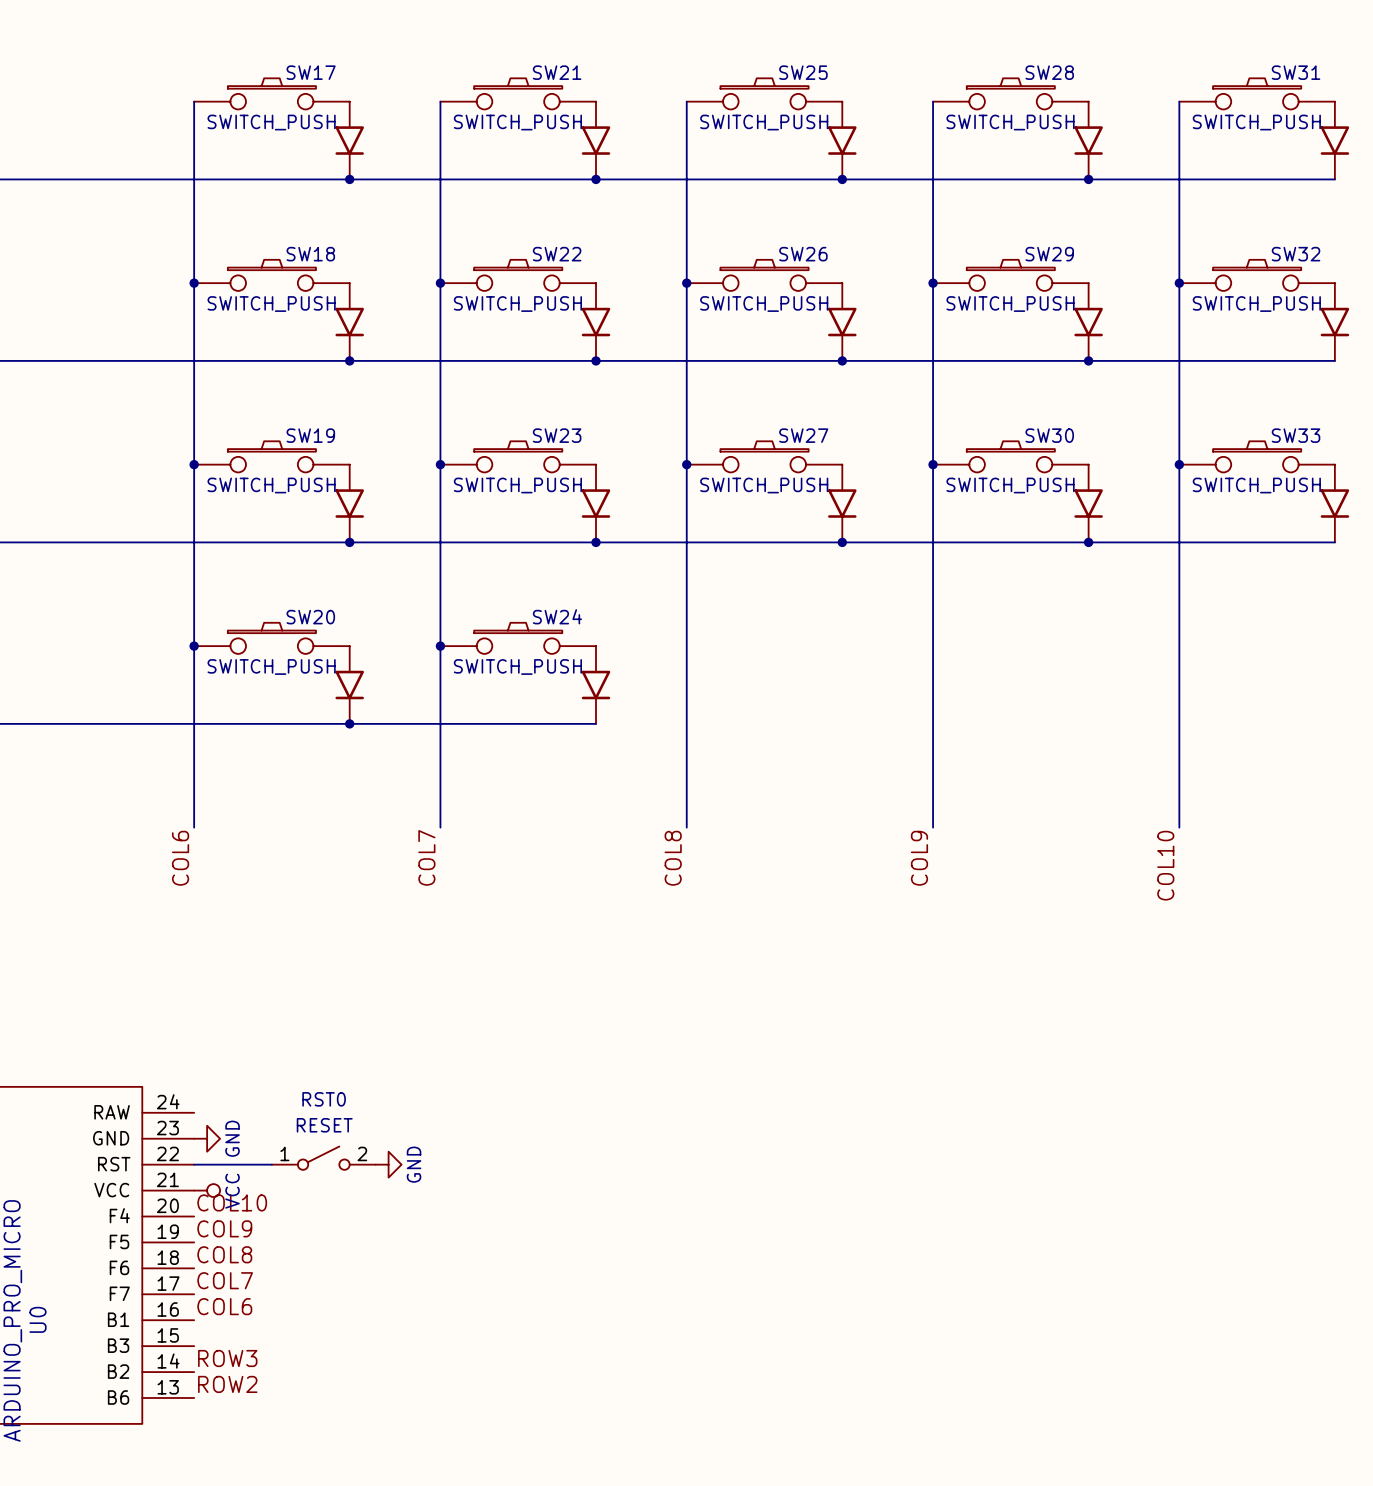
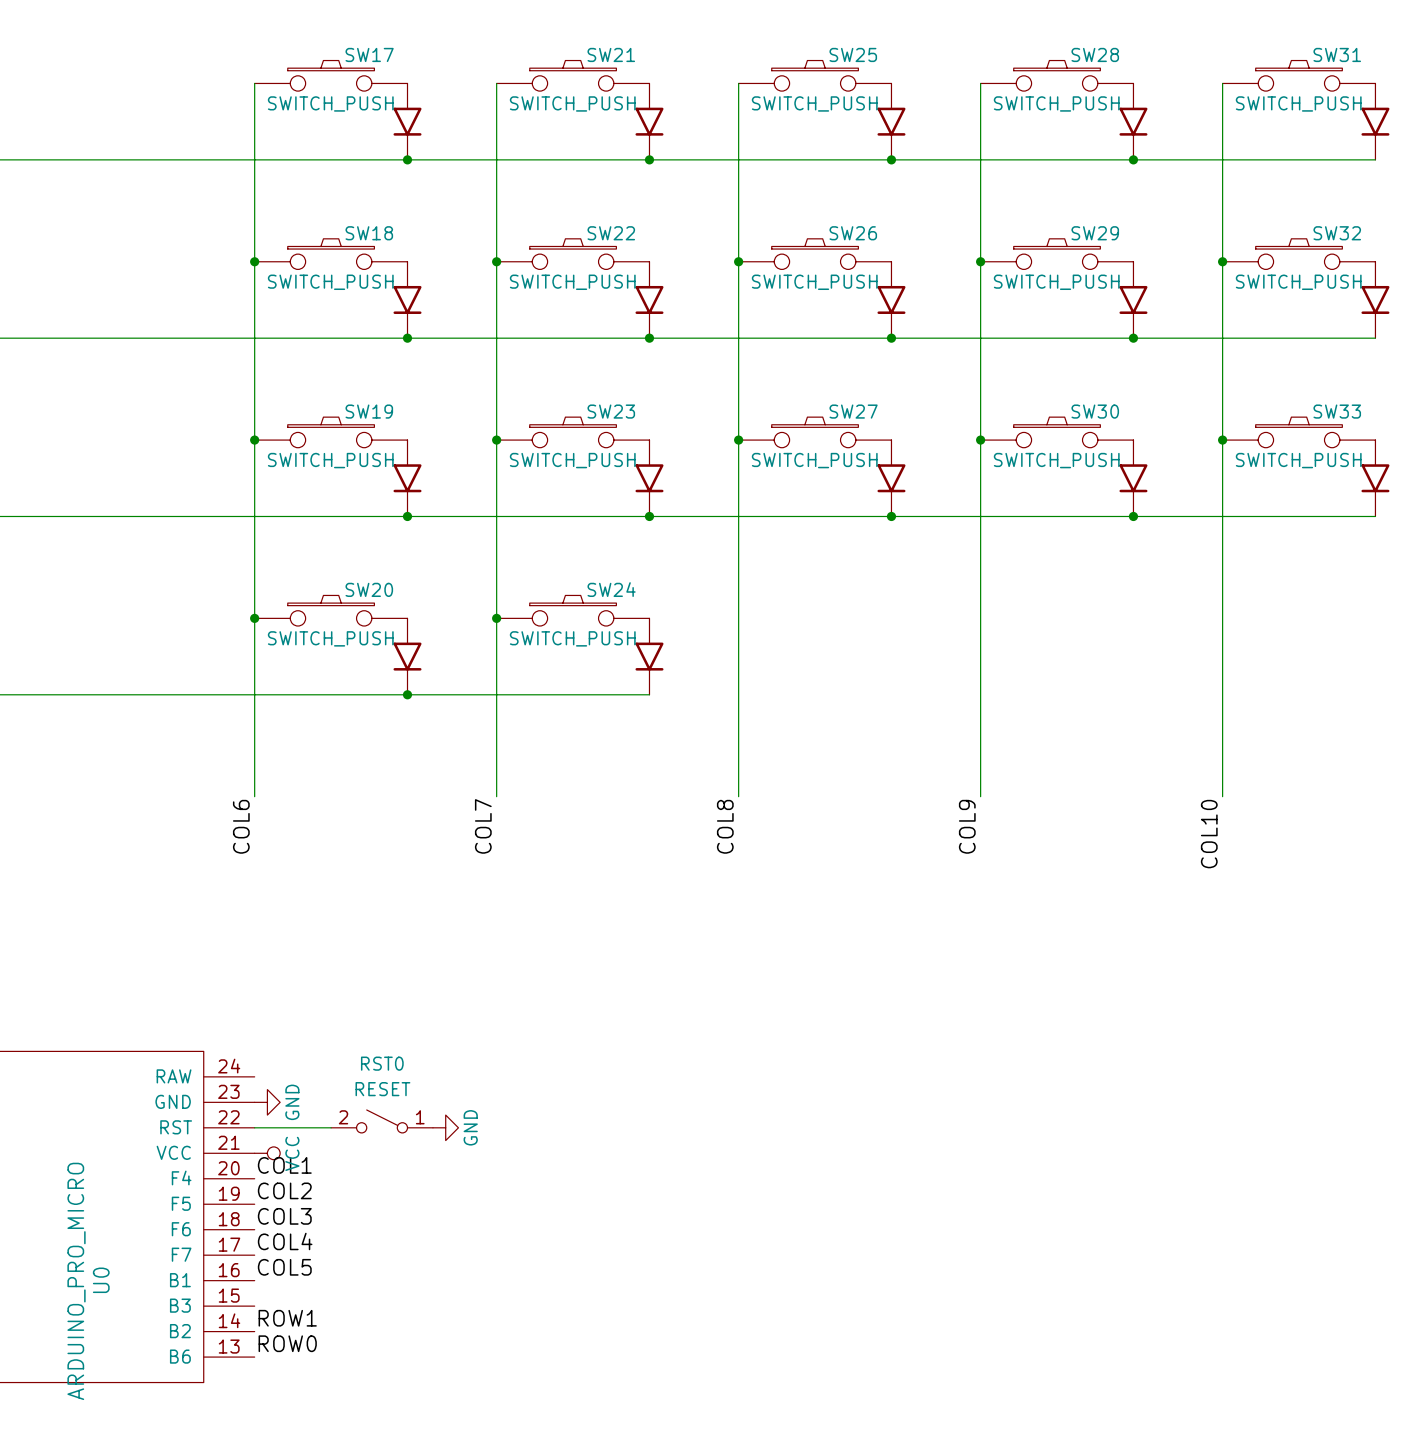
RST0 flip: as is (323, 1158) -> left-right (382, 1121)
label: COL10 (232, 1202) -> COL1 (284, 1165)
label: COL9 (224, 1228) -> COL2 (284, 1190)
label: COL8 (224, 1254) -> COL3 (284, 1216)
label: COL7 (225, 1280) -> COL4 (285, 1241)
label: COL6 (224, 1306) -> COL5 (284, 1267)
label: ROW3 (227, 1358) -> ROW1 (287, 1318)
label: ROW2 (227, 1384) -> ROW0 (287, 1343)

